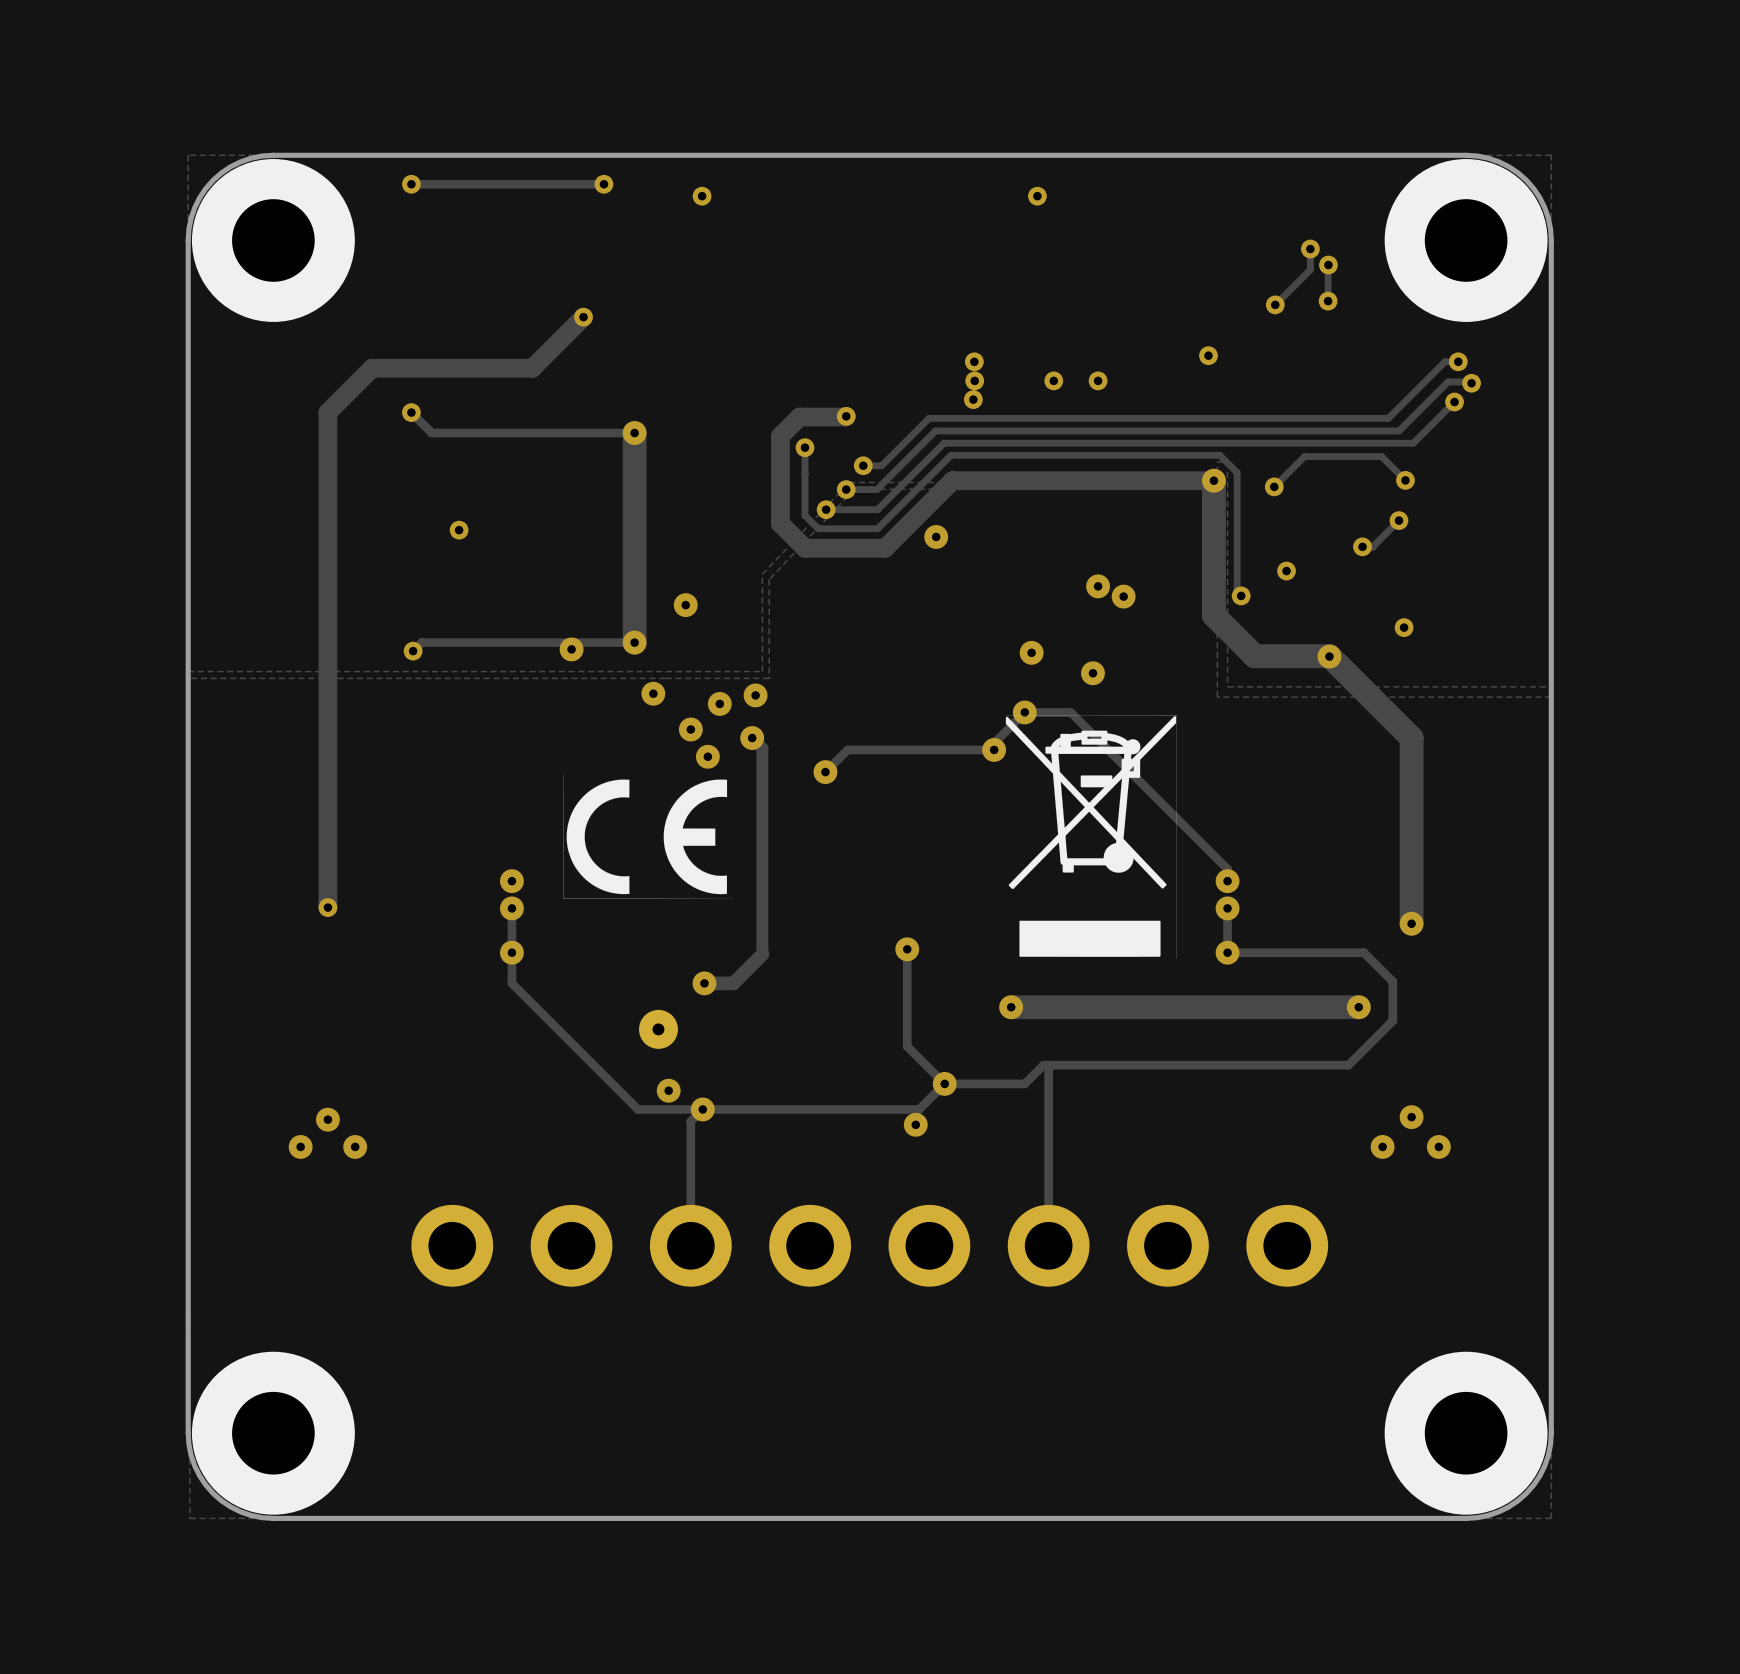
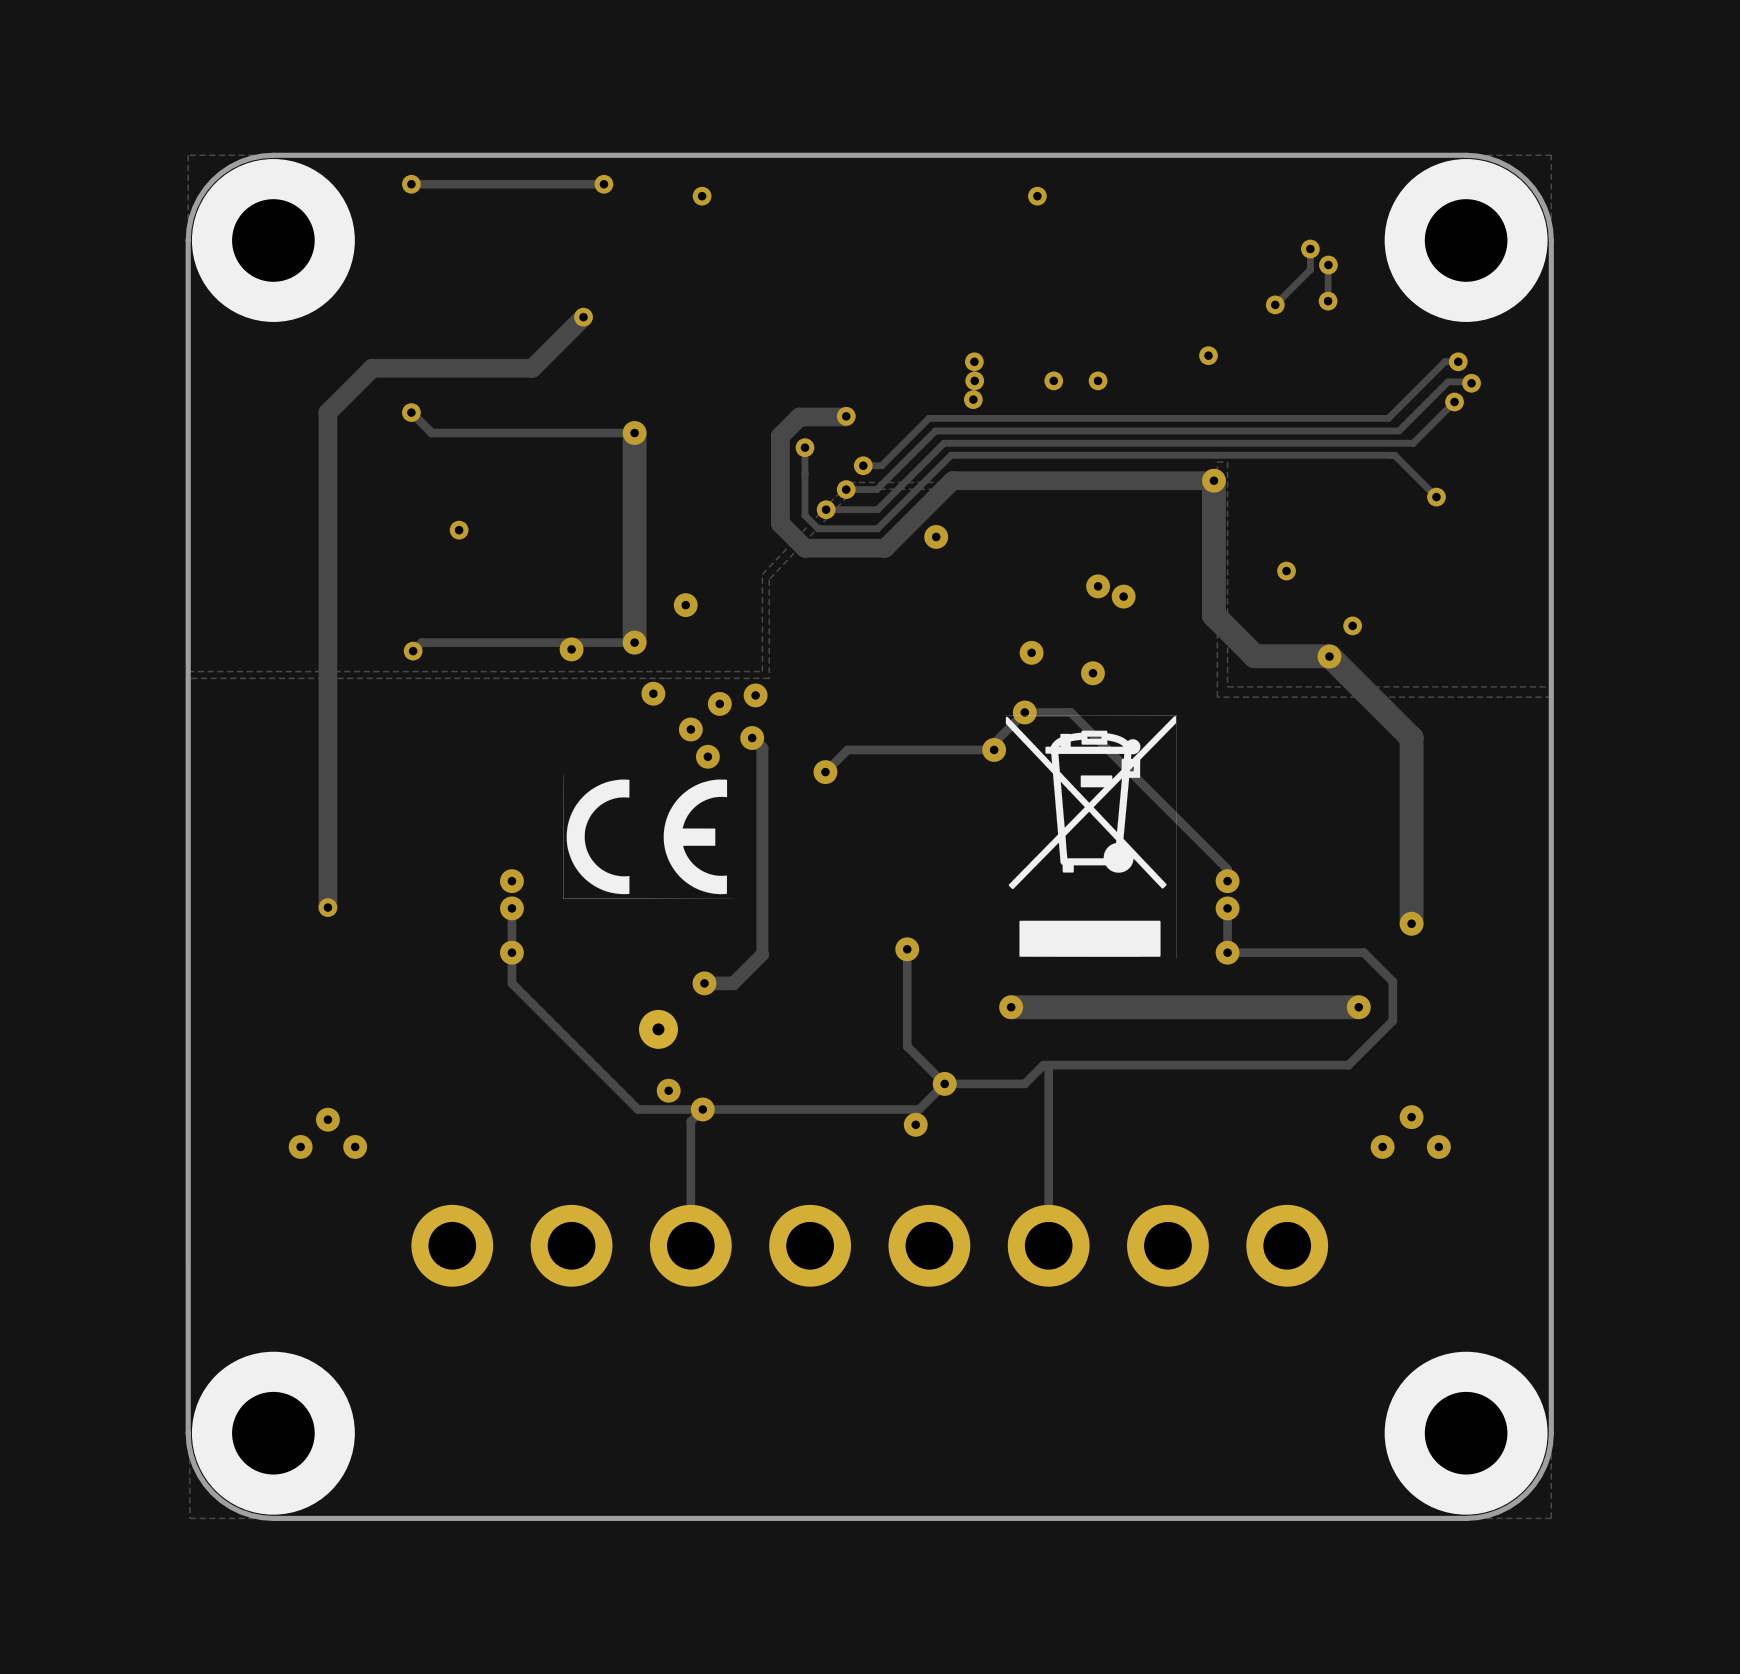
track: (1219, 455) (1237, 472) (1237, 591) (1241, 595) -> (1219, 455) (1390, 455)
track: none -> (1390, 455) (1394, 455) (1436, 497)
track: (1405, 480) (1381, 456) (1304, 456) (1274, 486) -> none
via: (1405, 480) -> none
via: (1274, 486) -> none
via: none -> (1436, 497)
track: (1398, 520) (1372, 546) (1362, 546) -> none
via: (1398, 520) -> none
via: (1362, 546) -> none
via: (1241, 595) -> none
via: none -> (1352, 625)
via: (1404, 627) -> none

